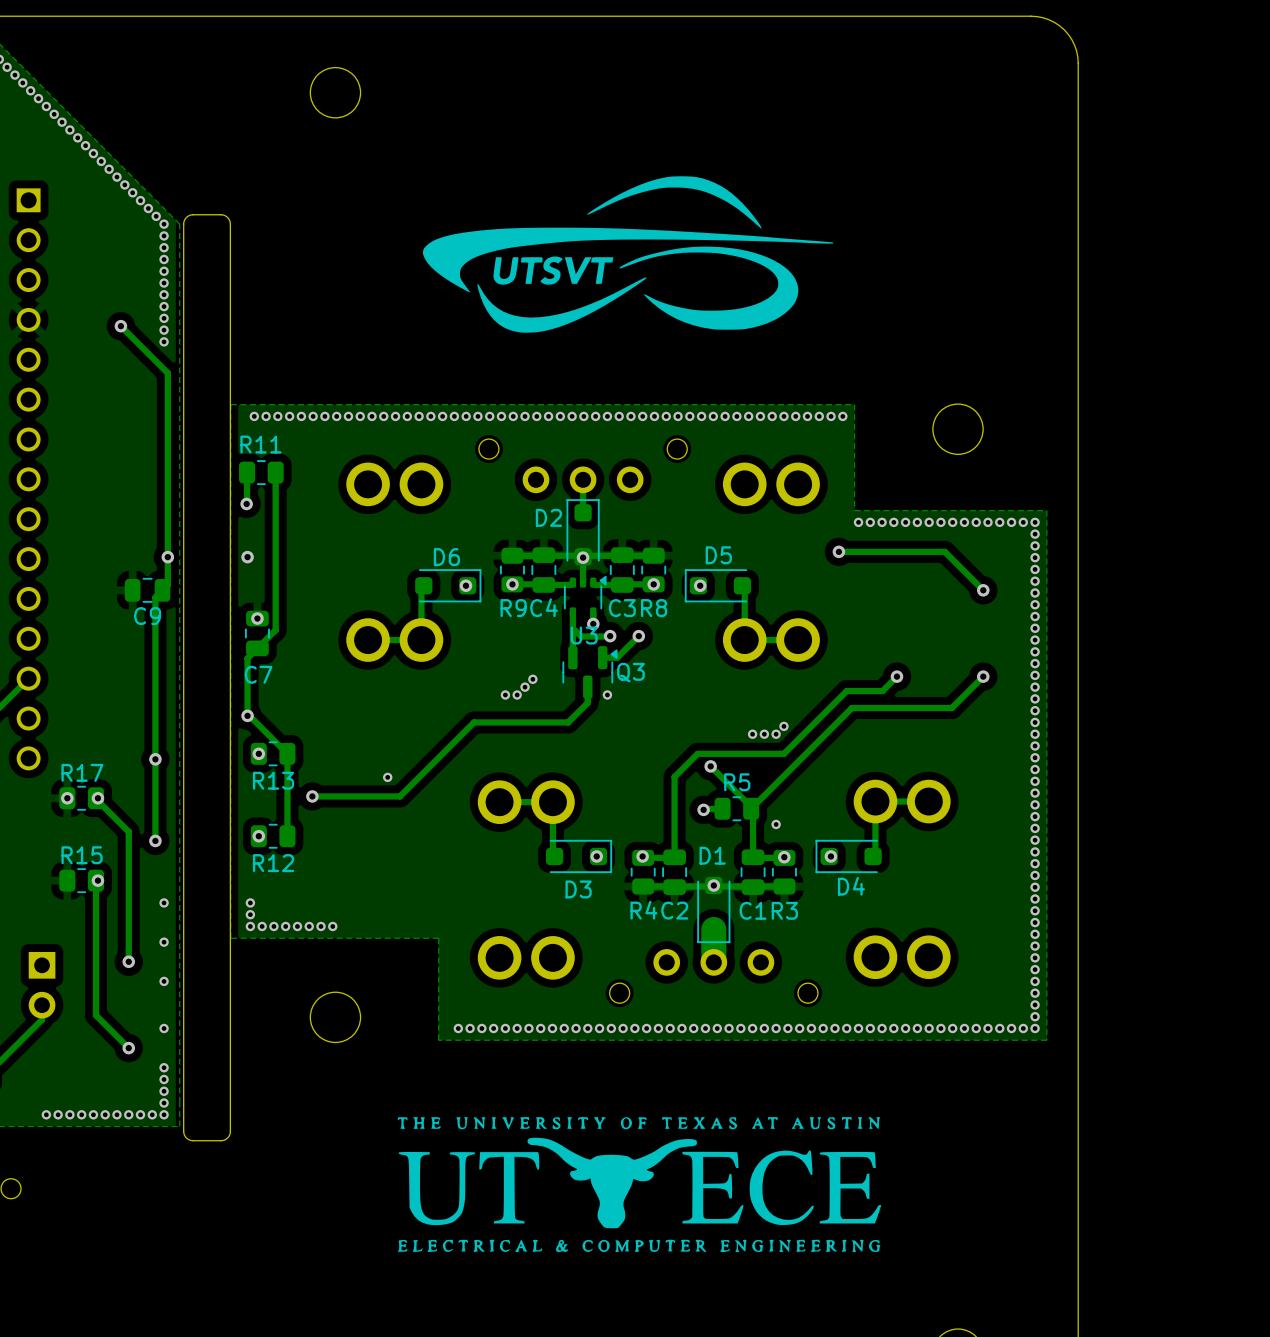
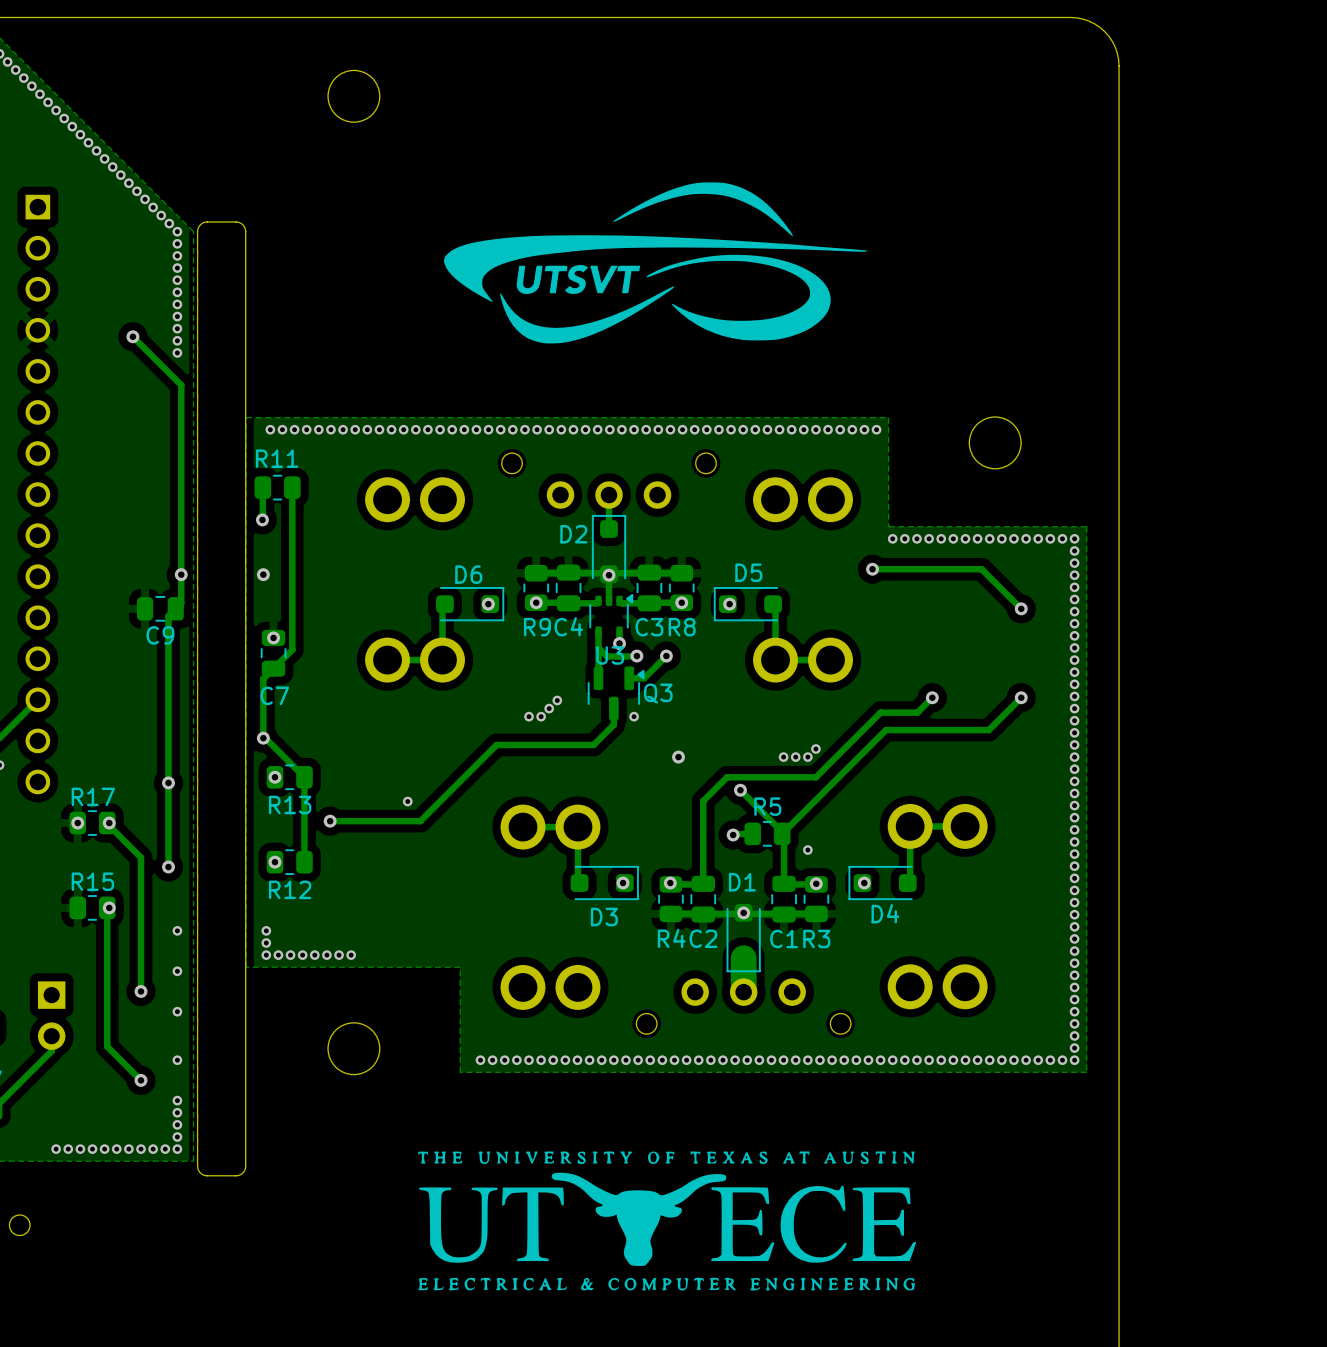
via: none -> (678, 757)

